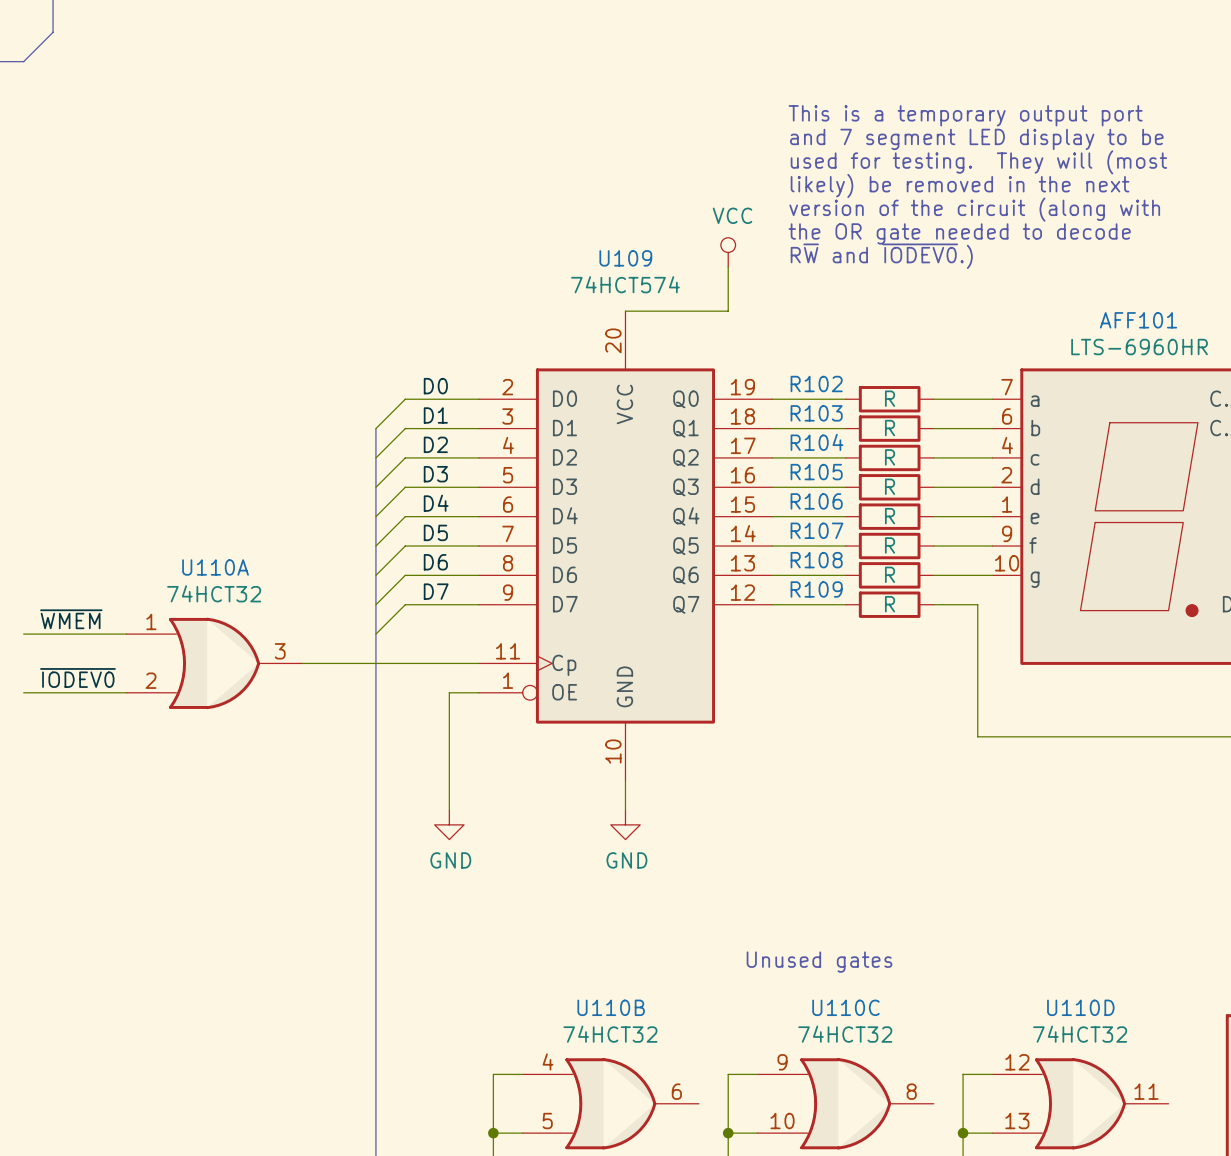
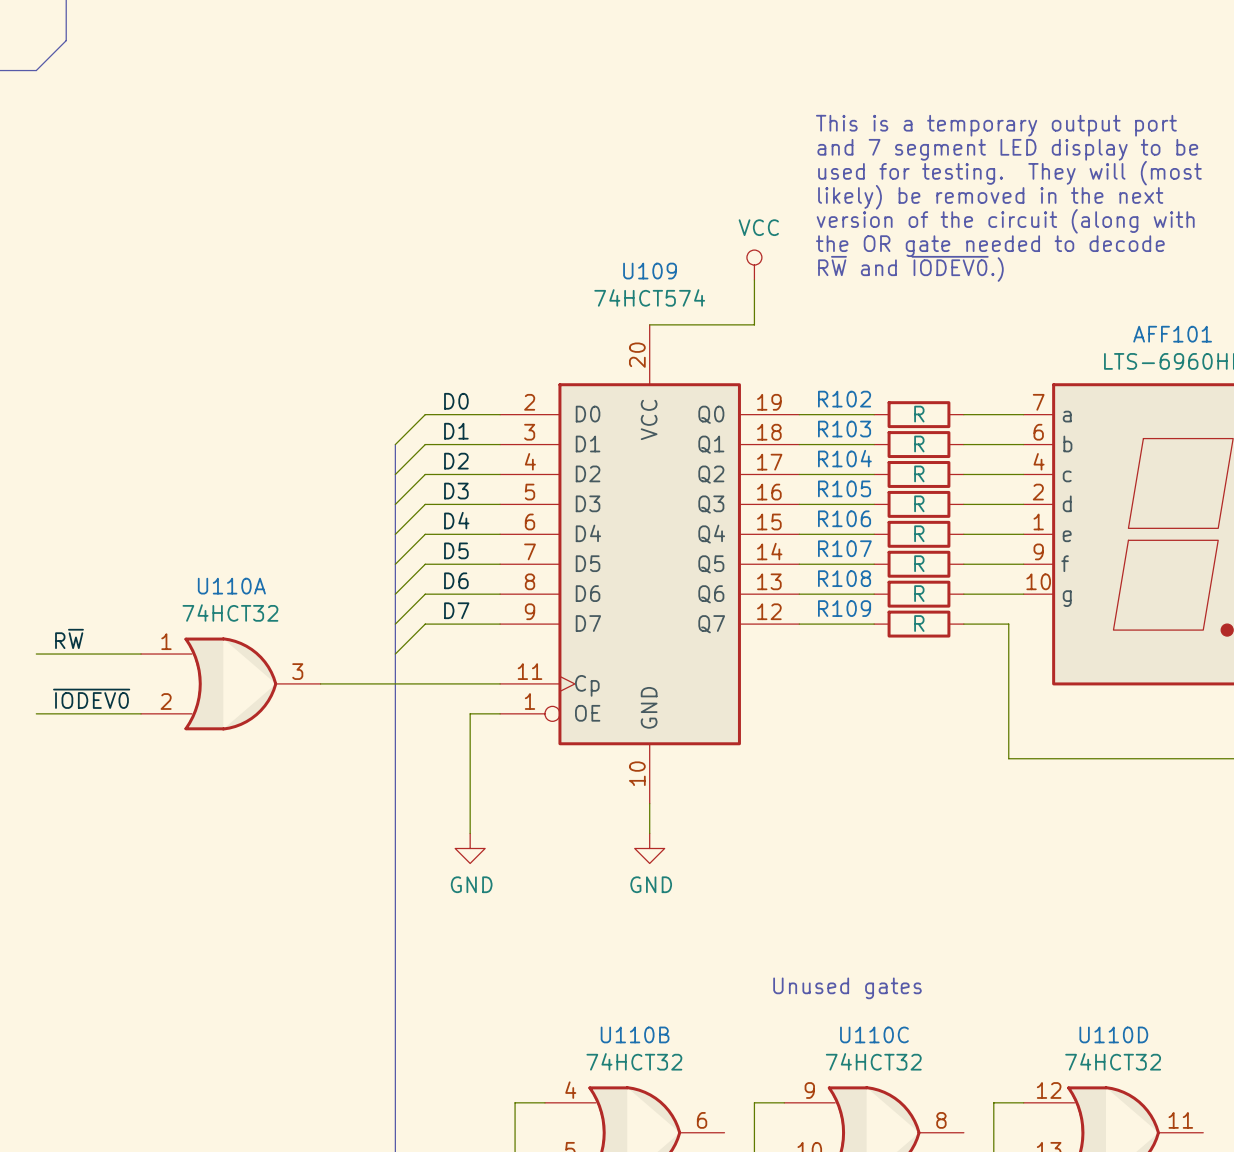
label: ~{WMEM} (71, 619) -> R~{W} (69, 638)

